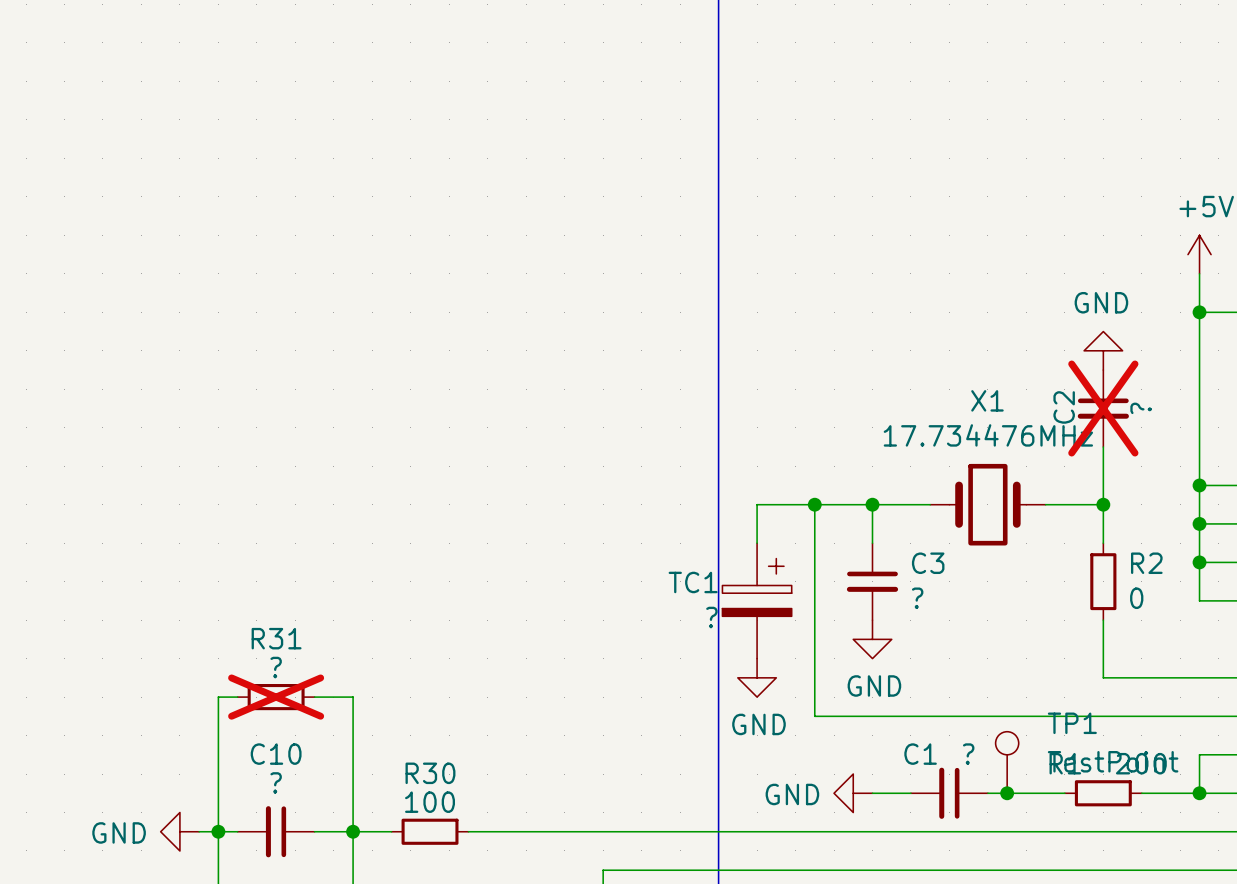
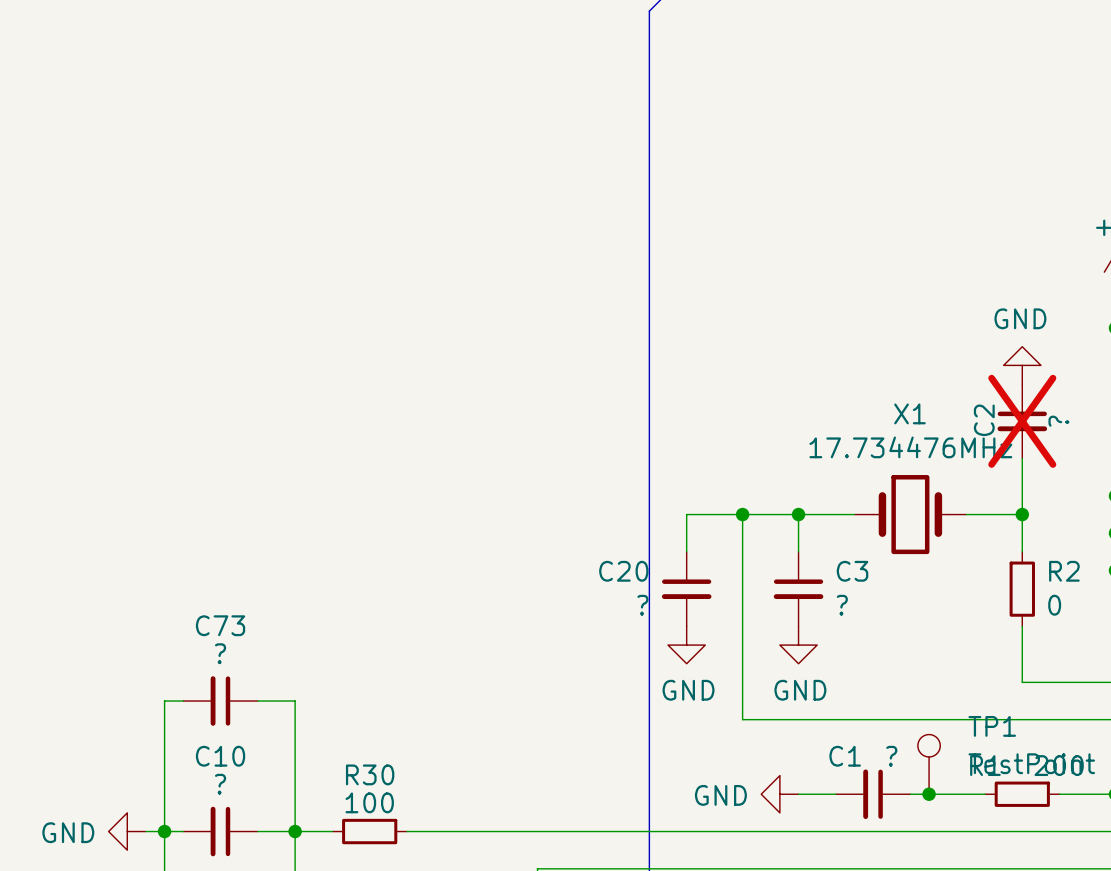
C20: none -> ? (686, 589)
TC1: ? (757, 600) -> none
power symbol position: GND (757, 677) -> GND (686, 645)
R31: ? (276, 697) -> none
C73: none -> ? (220, 701)

